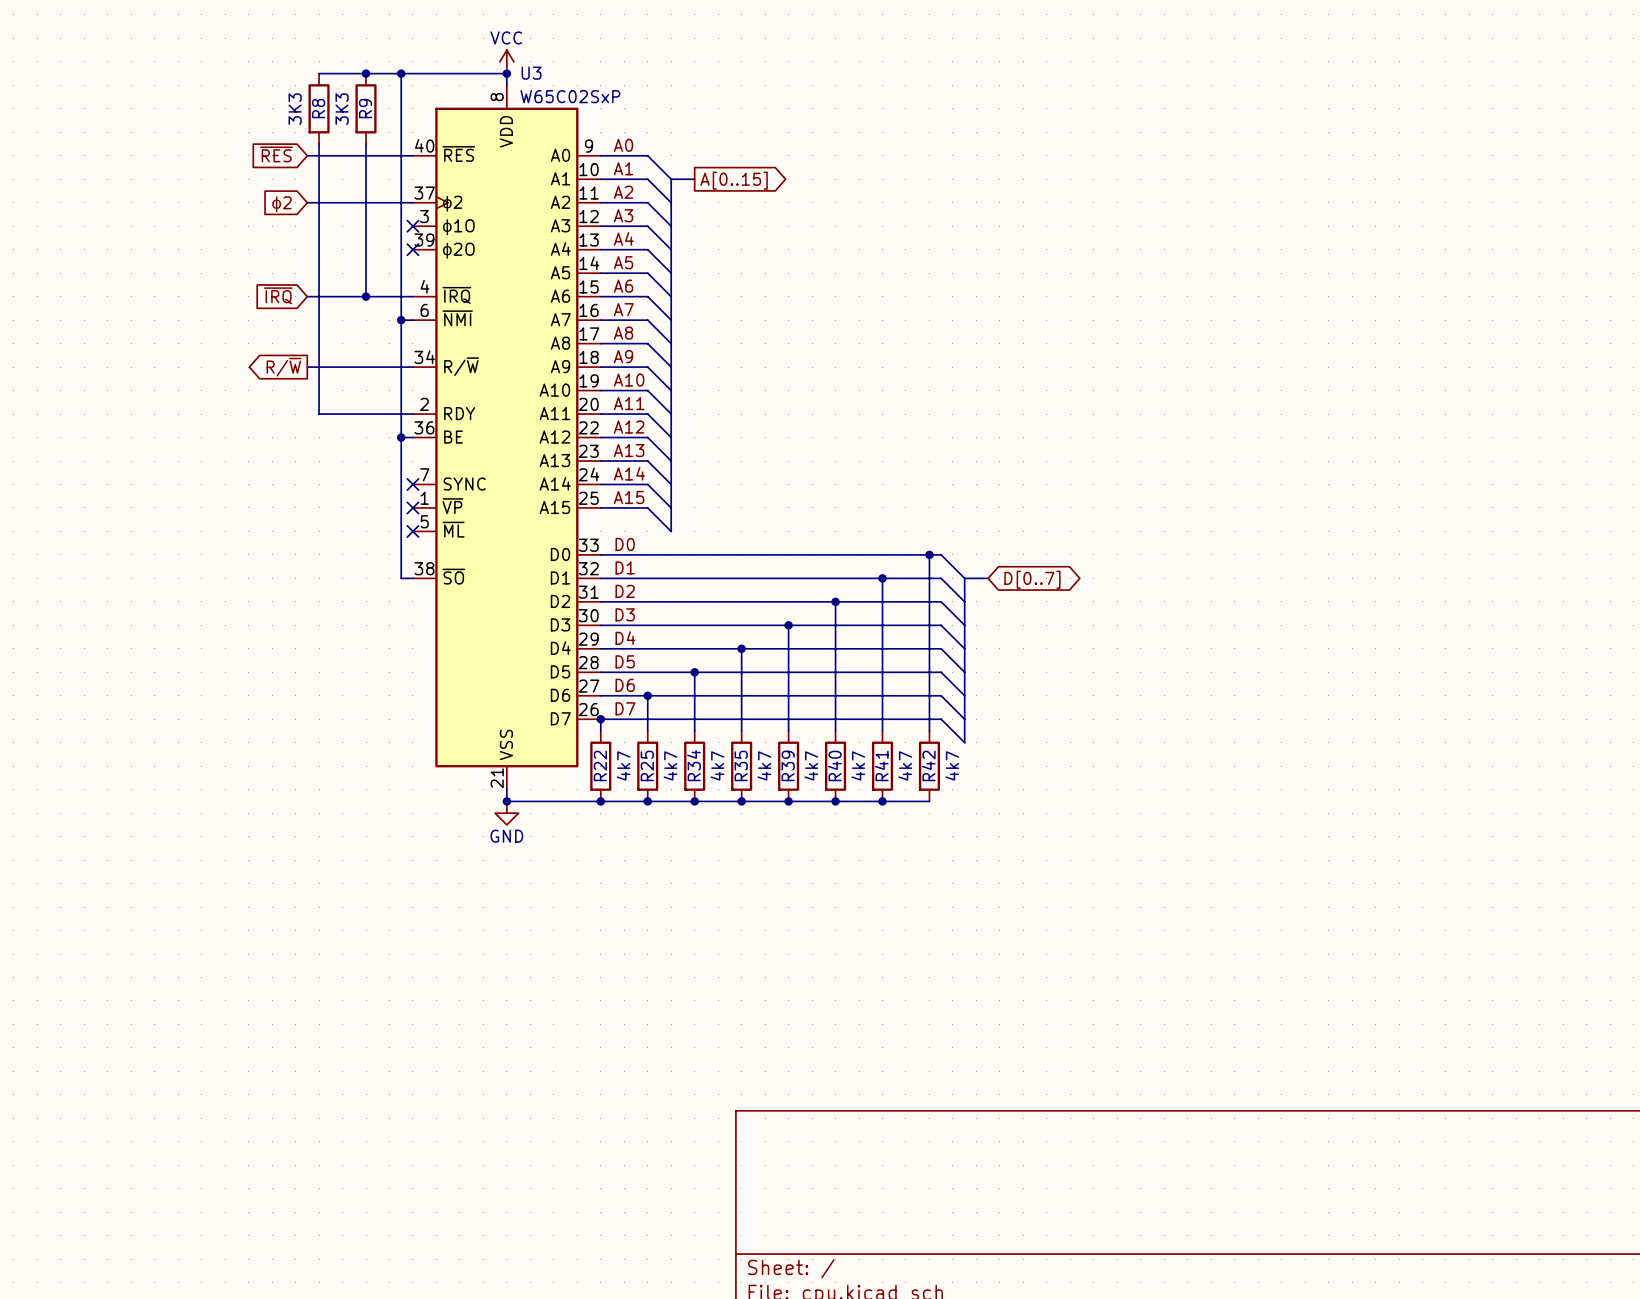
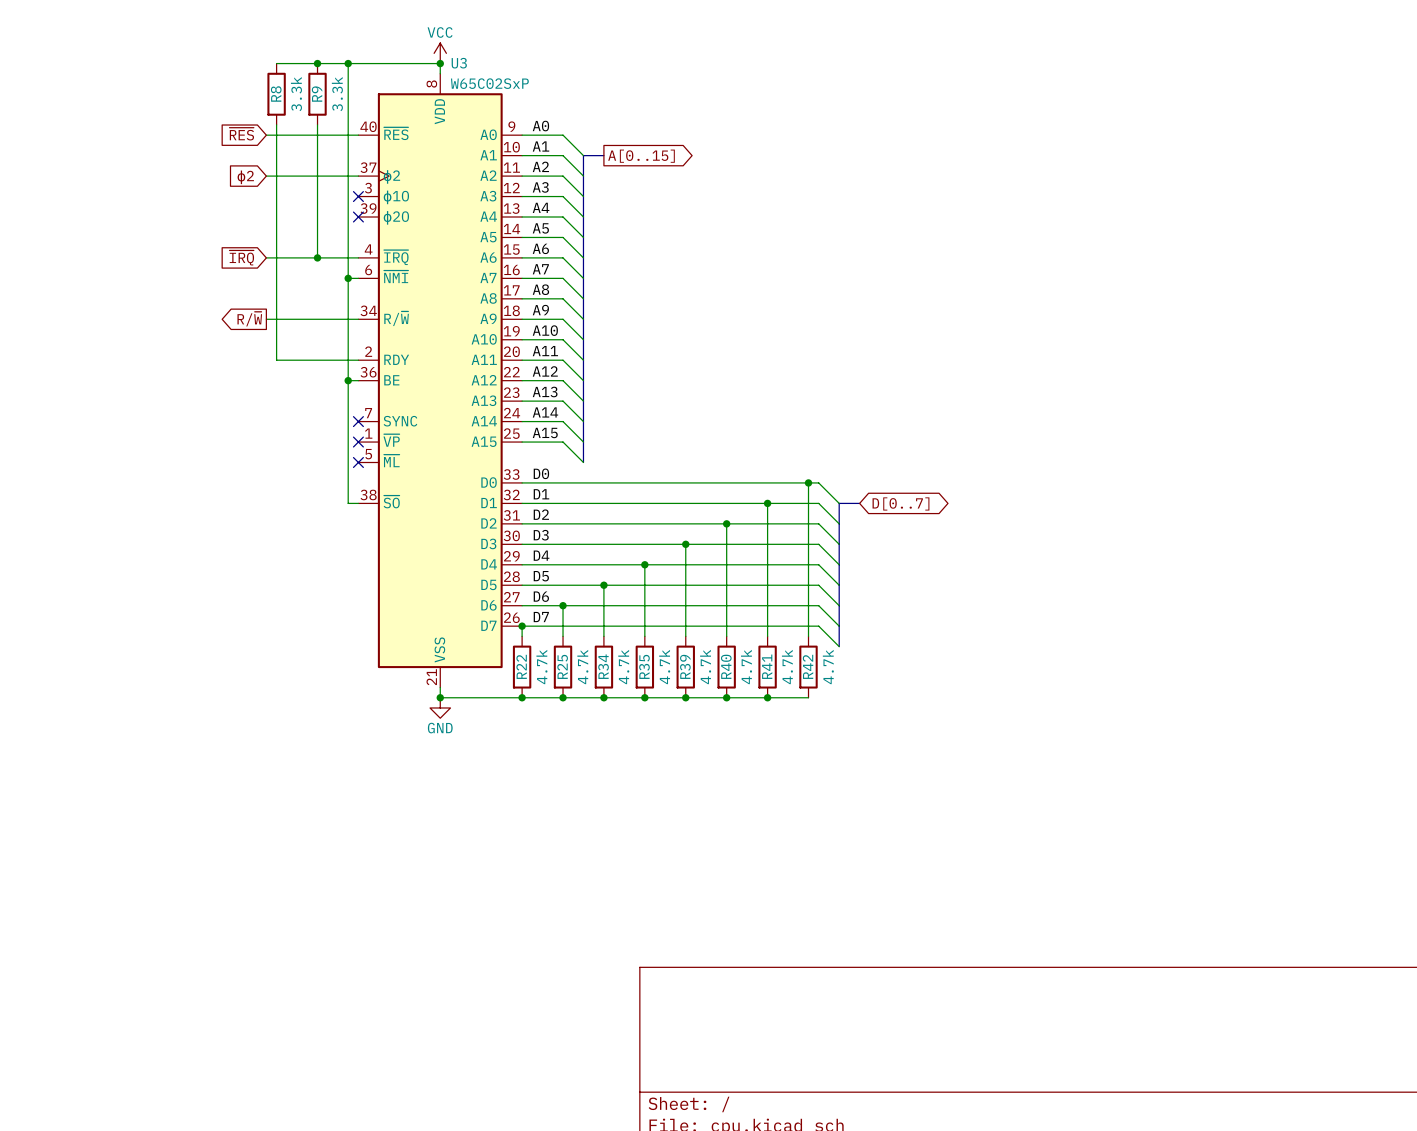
R8 value: 3K3 (295, 109) -> 3.3k (296, 94)
R9 value: 3K3 (342, 109) -> 3.3k (337, 94)
R22 value: 4k7 (623, 765) -> 4.7k (541, 667)
R25 value: 4k7 (670, 765) -> 4.7k (582, 667)
R34 value: 4k7 (717, 765) -> 4.7k (623, 667)
R35 value: 4k7 (764, 765) -> 4.7k (664, 667)
R39 value: 4k7 (811, 765) -> 4.7k (705, 667)
R40 value: 4k7 (858, 765) -> 4.7k (746, 667)
R41 value: 4k7 (905, 765) -> 4.7k (787, 667)
R42 value: 4k7 (952, 765) -> 4.7k (828, 667)

